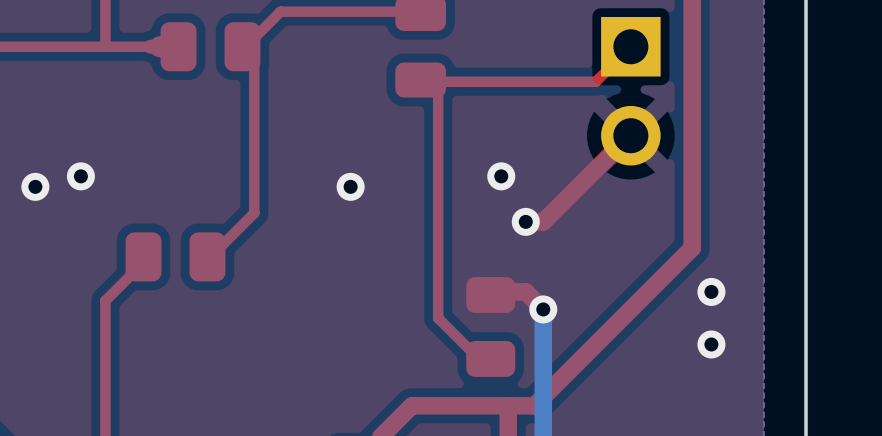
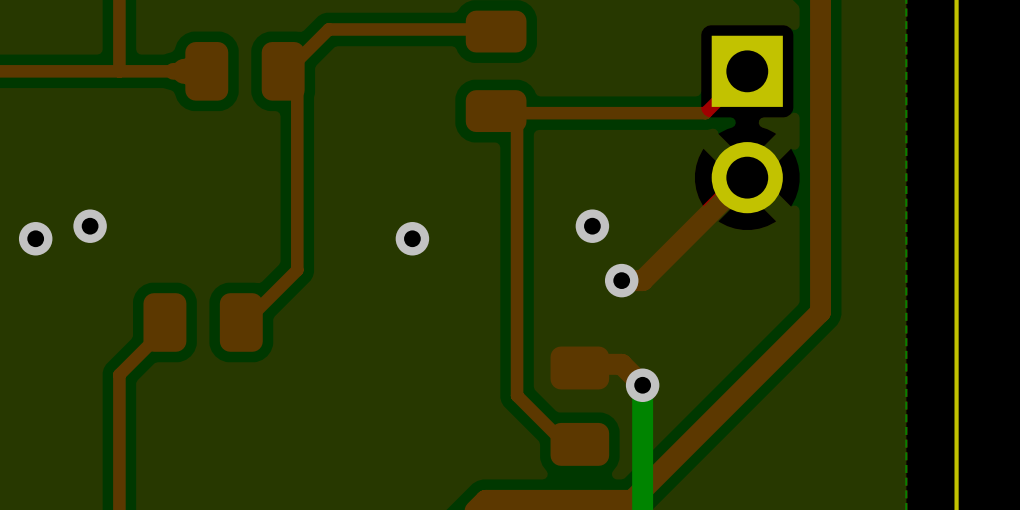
via: (711, 291) -> none
via: (711, 344) -> none

